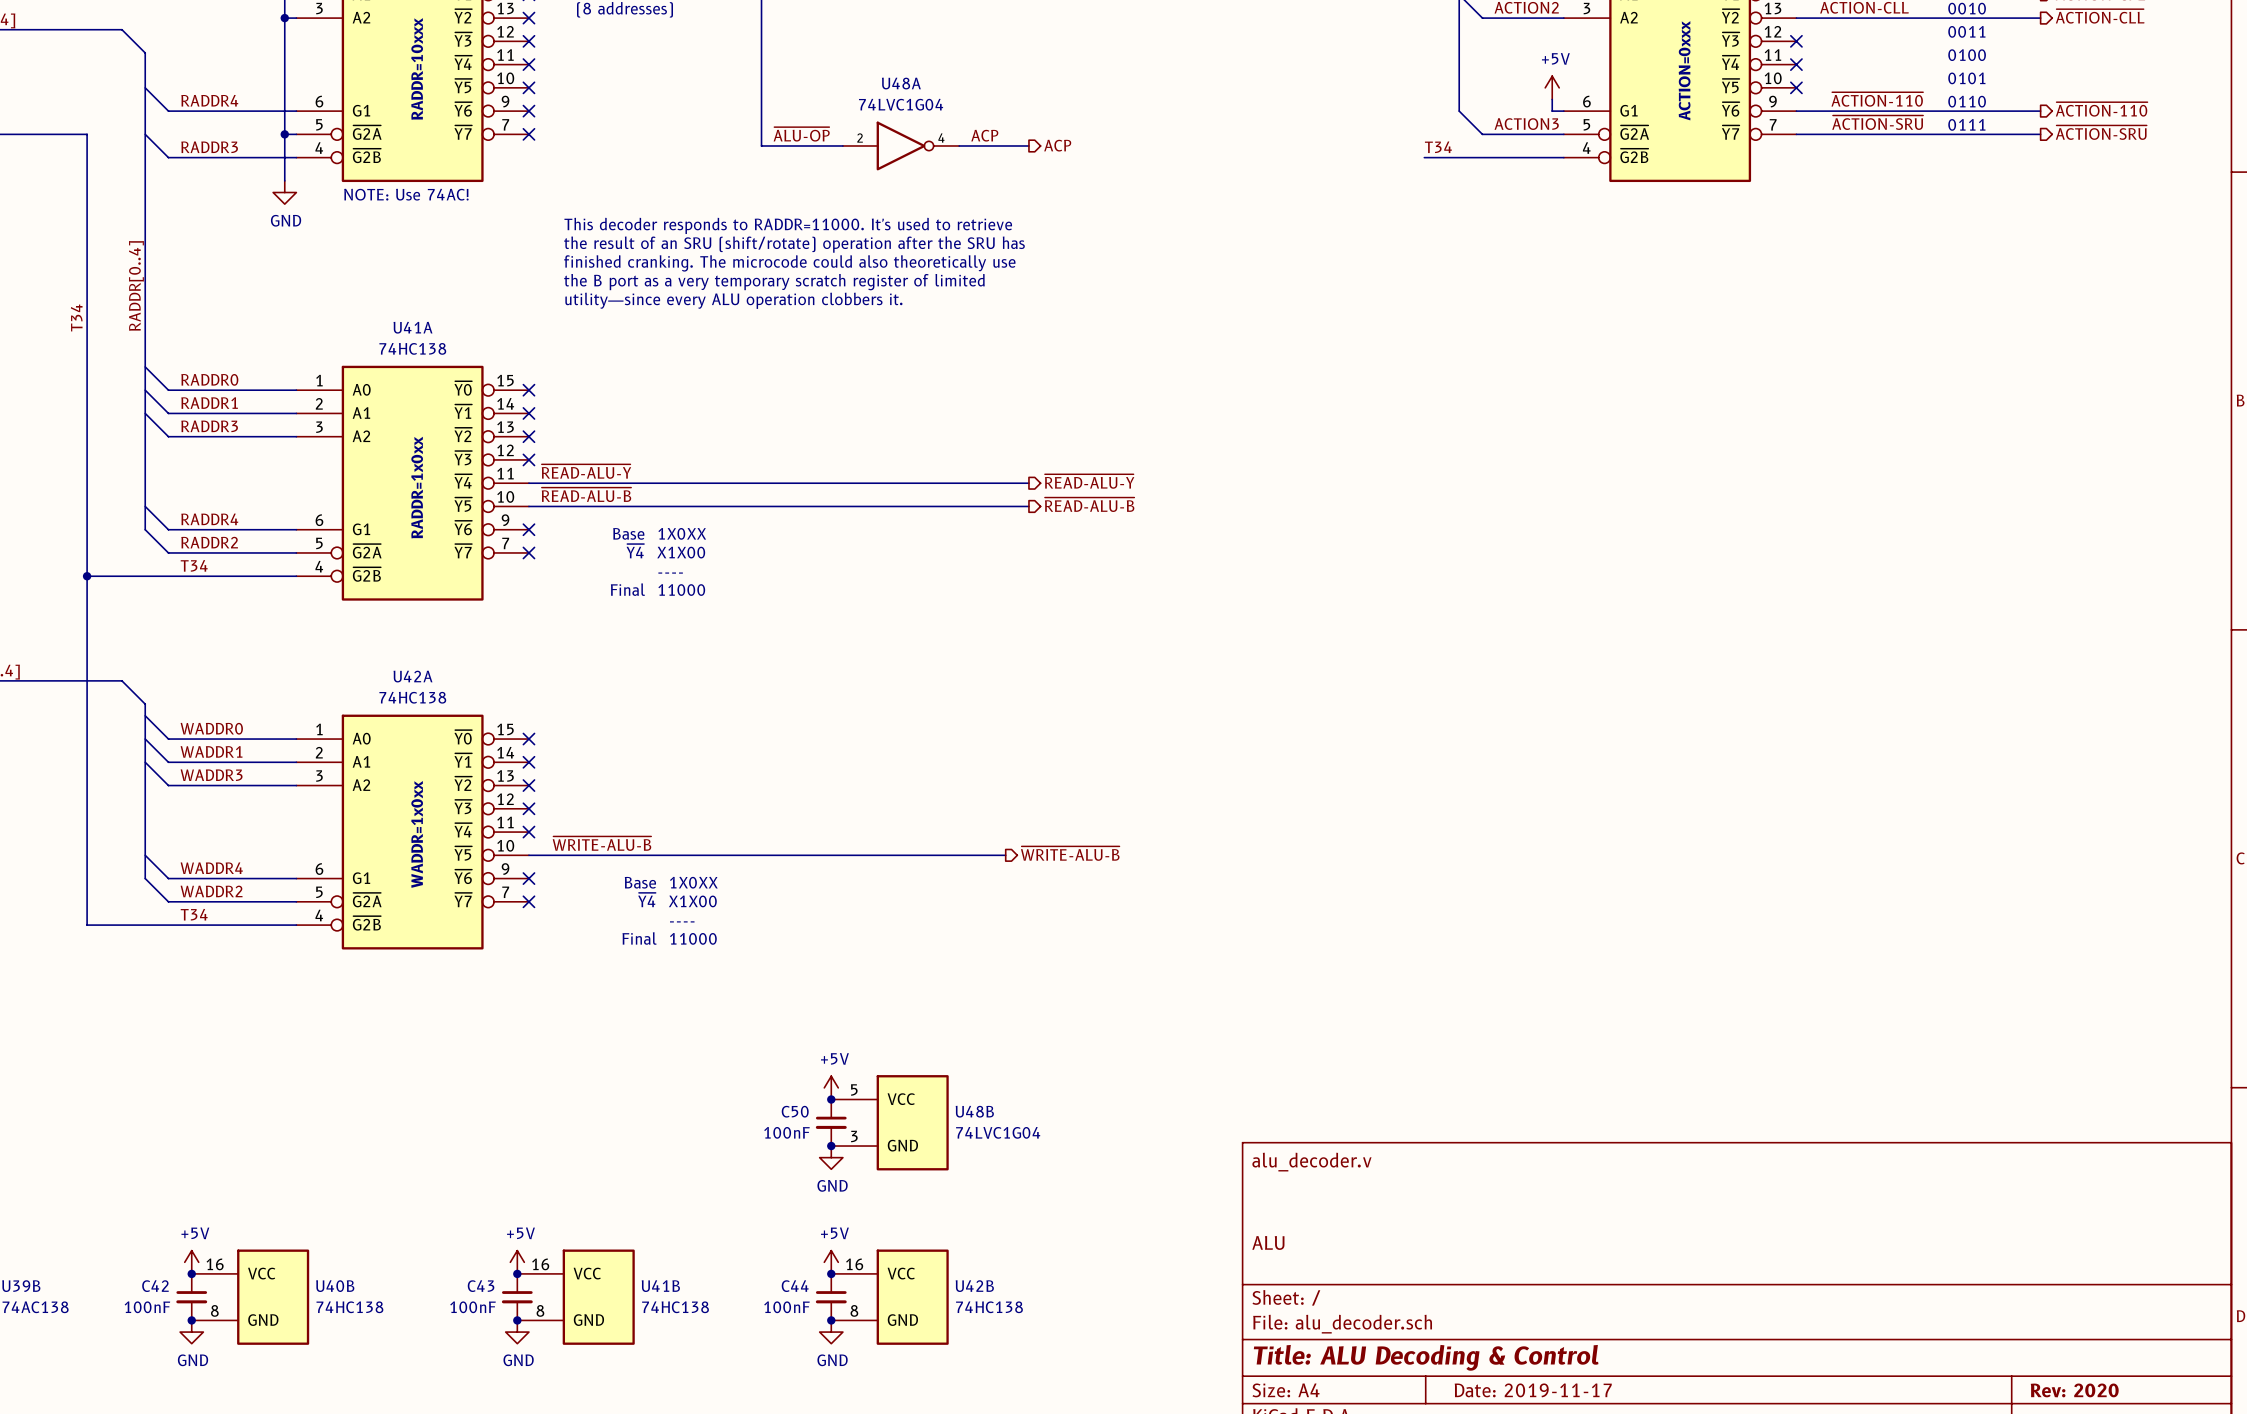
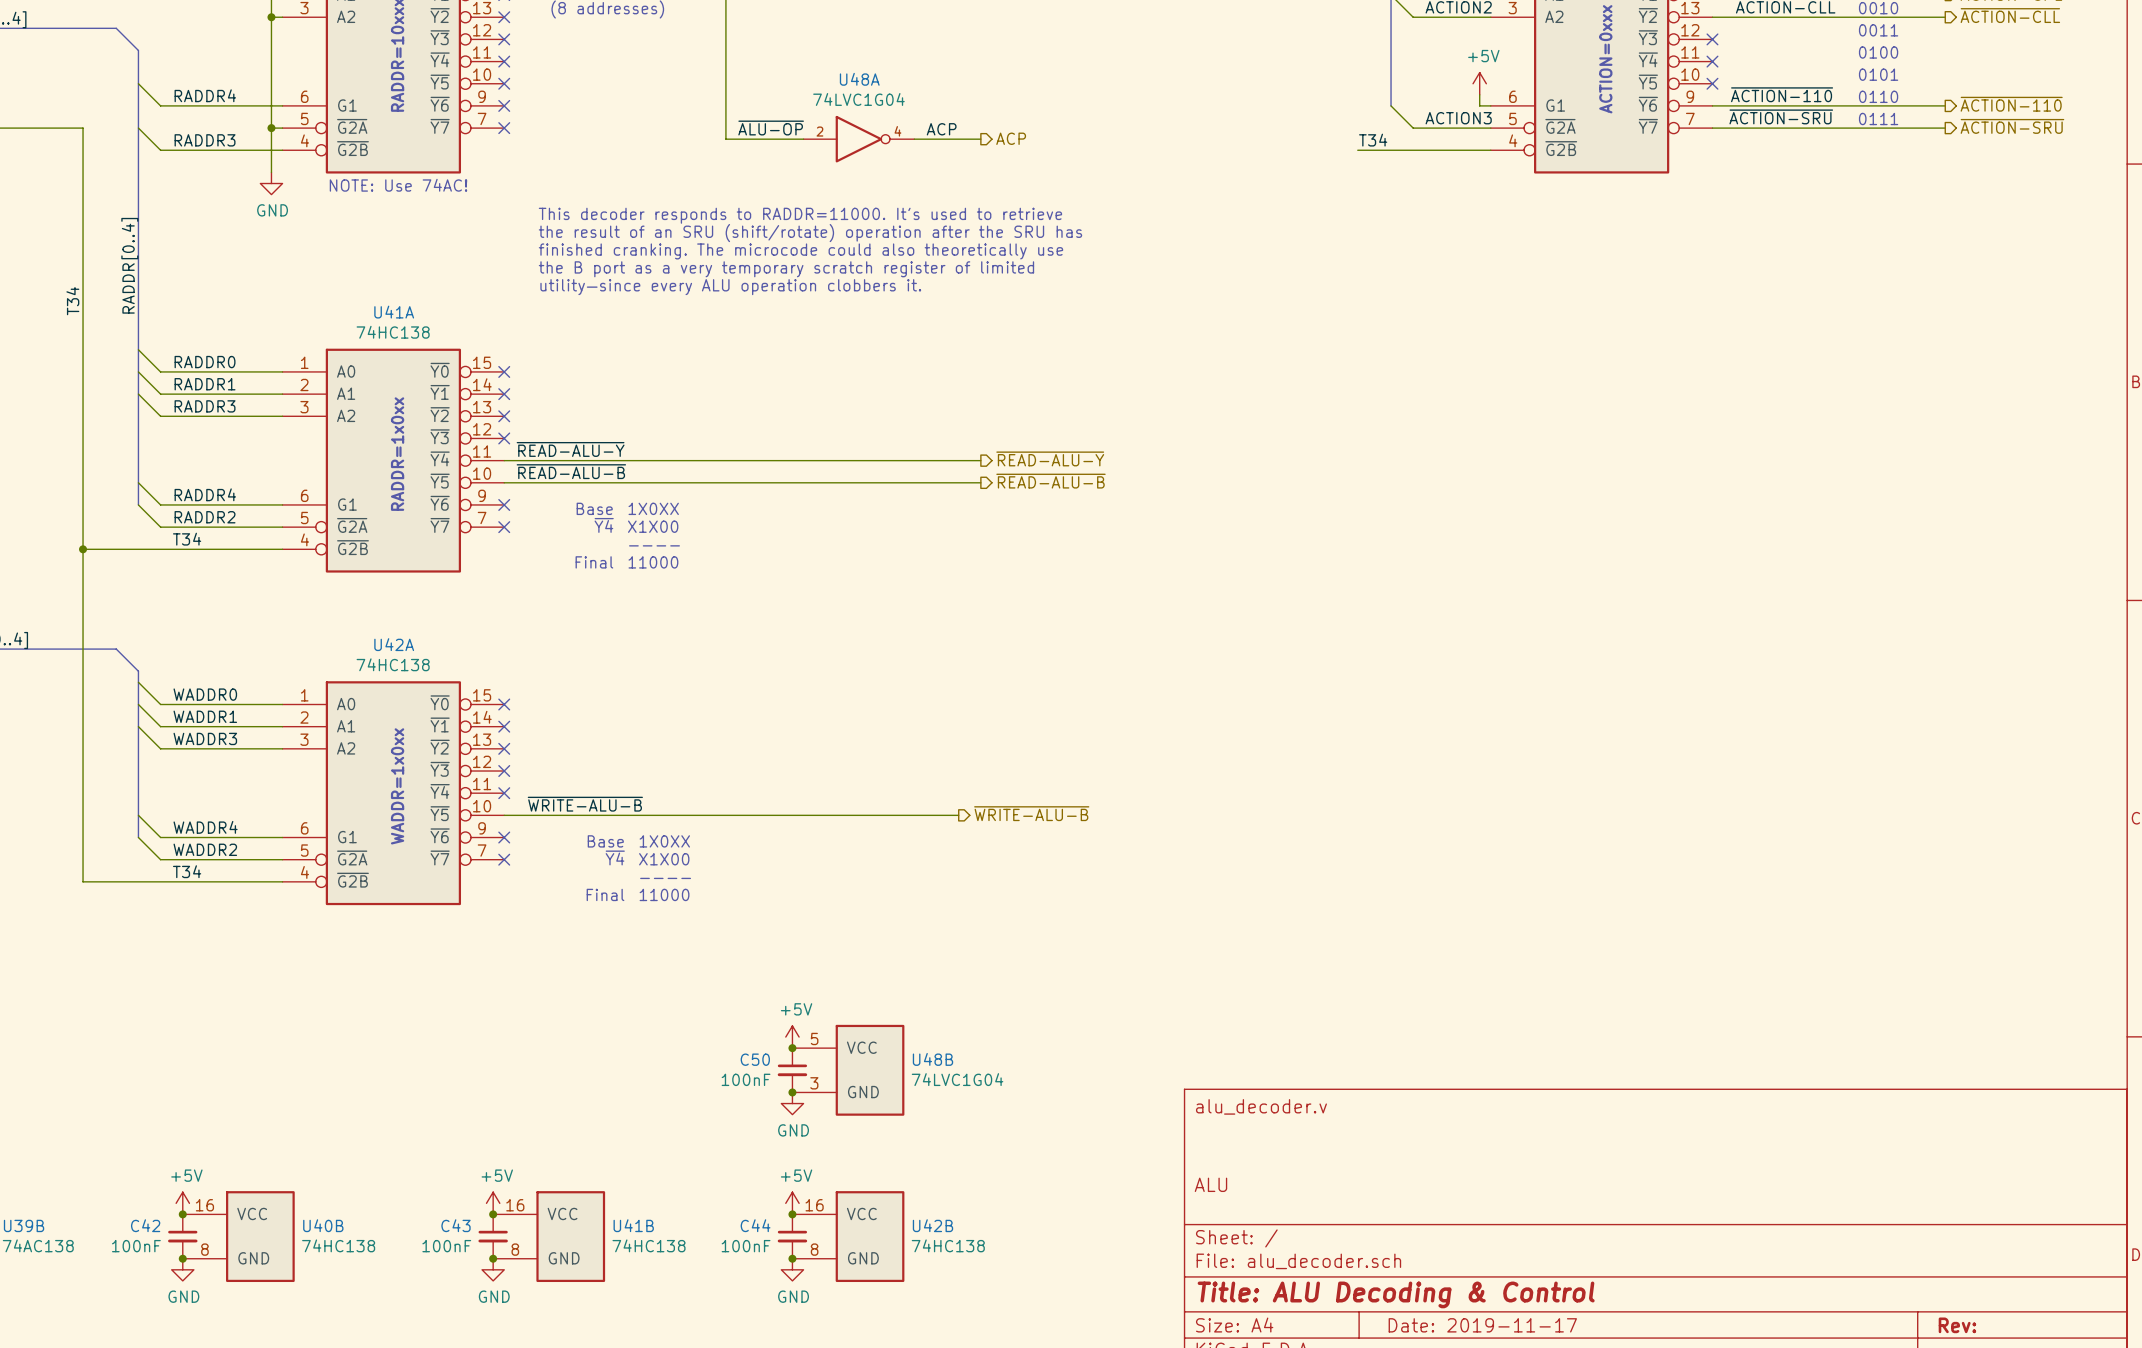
title block: Rev: 2020 (2074, 1390) -> Rev: (1957, 1325)

